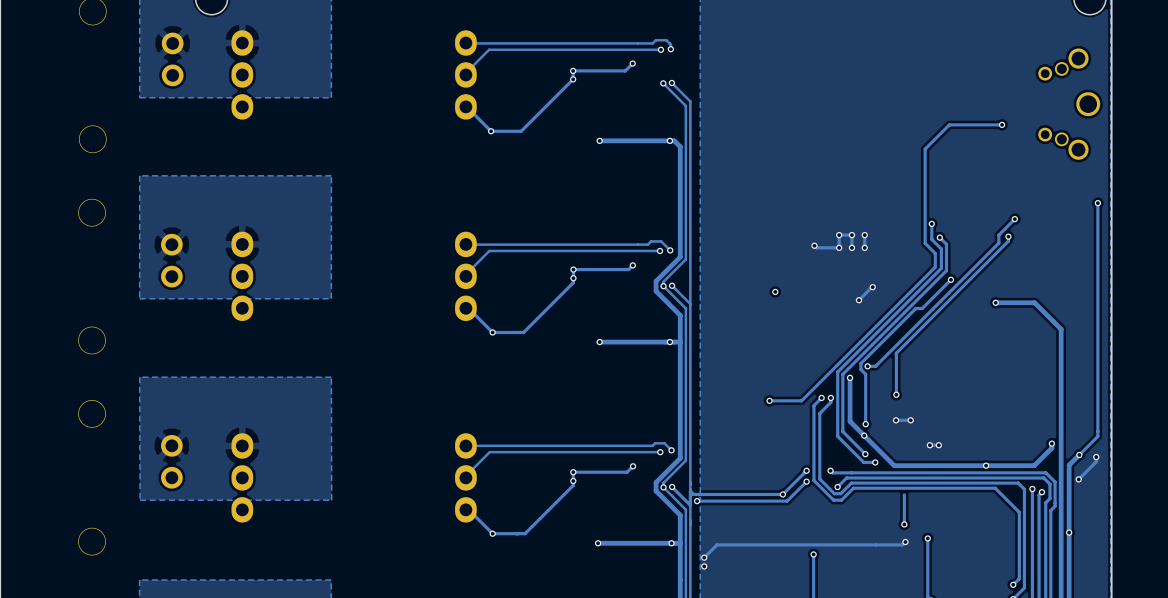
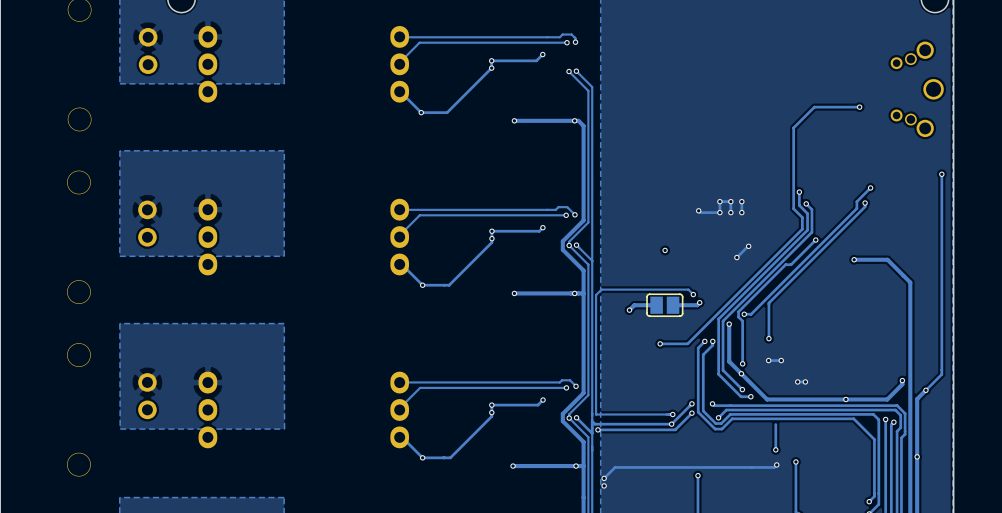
track: none -> (693, 294) (688, 289) (601, 289) (596, 295) (596, 414) (672, 414)
via: none -> (693, 294)
track: none -> (699, 302) (697, 305) (673, 305)
via: none -> (699, 302)
track: none -> (656, 305) (634, 305) (629, 310)
part: none -> (664, 305)
via: none -> (629, 310)
track: (1096, 457) (1096, 461) (1078, 479) -> none
via: (1096, 457) -> none
via: (1078, 479) -> none
via: none -> (672, 414)

